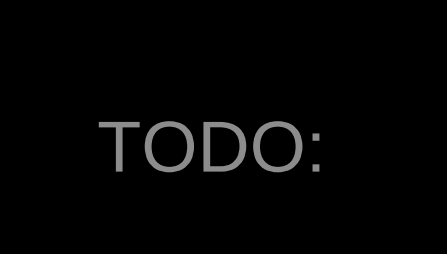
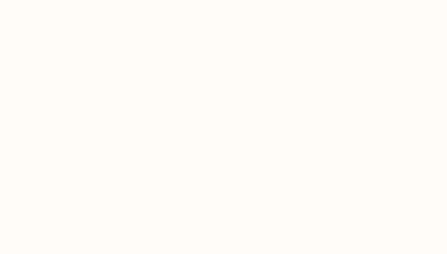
text: TODO: (209, 146) -> none

